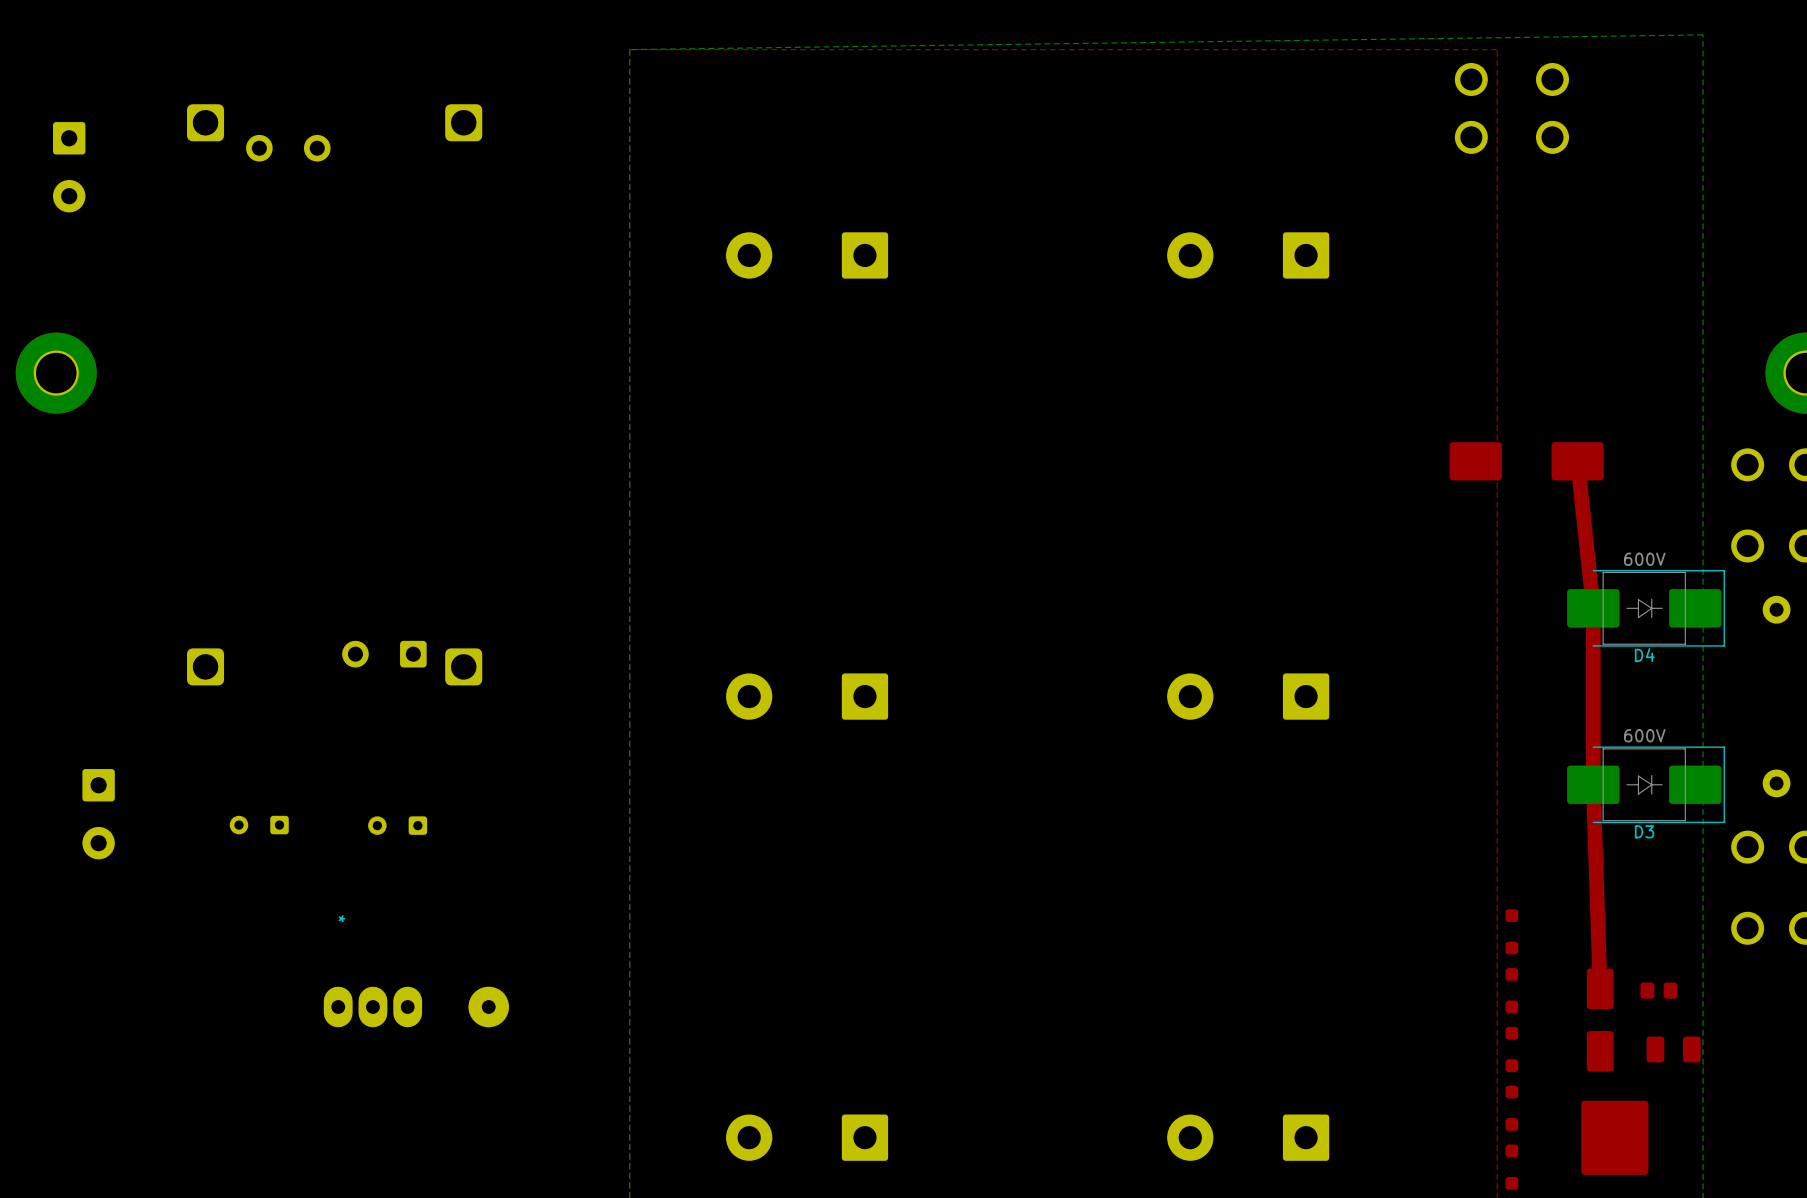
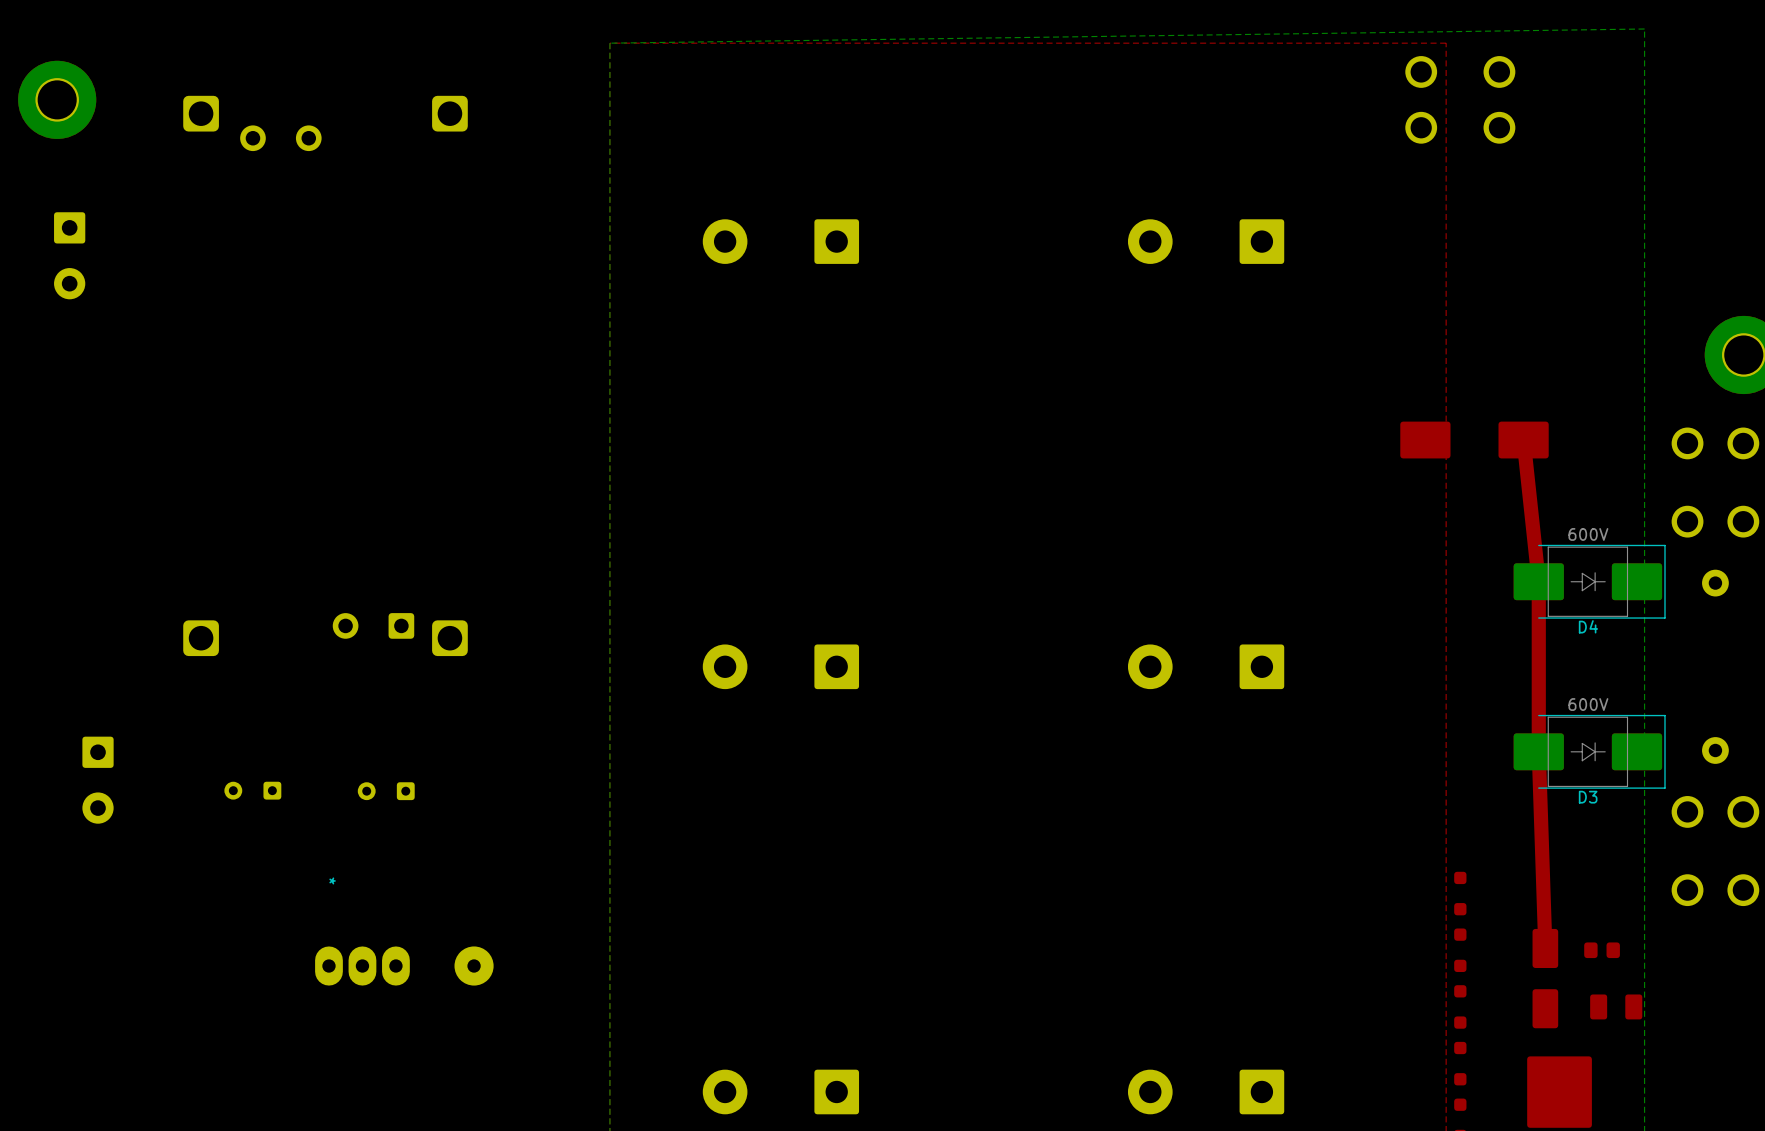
part position: (69, 167) -> (69, 255)
part position: (56, 373) -> (57, 99)

